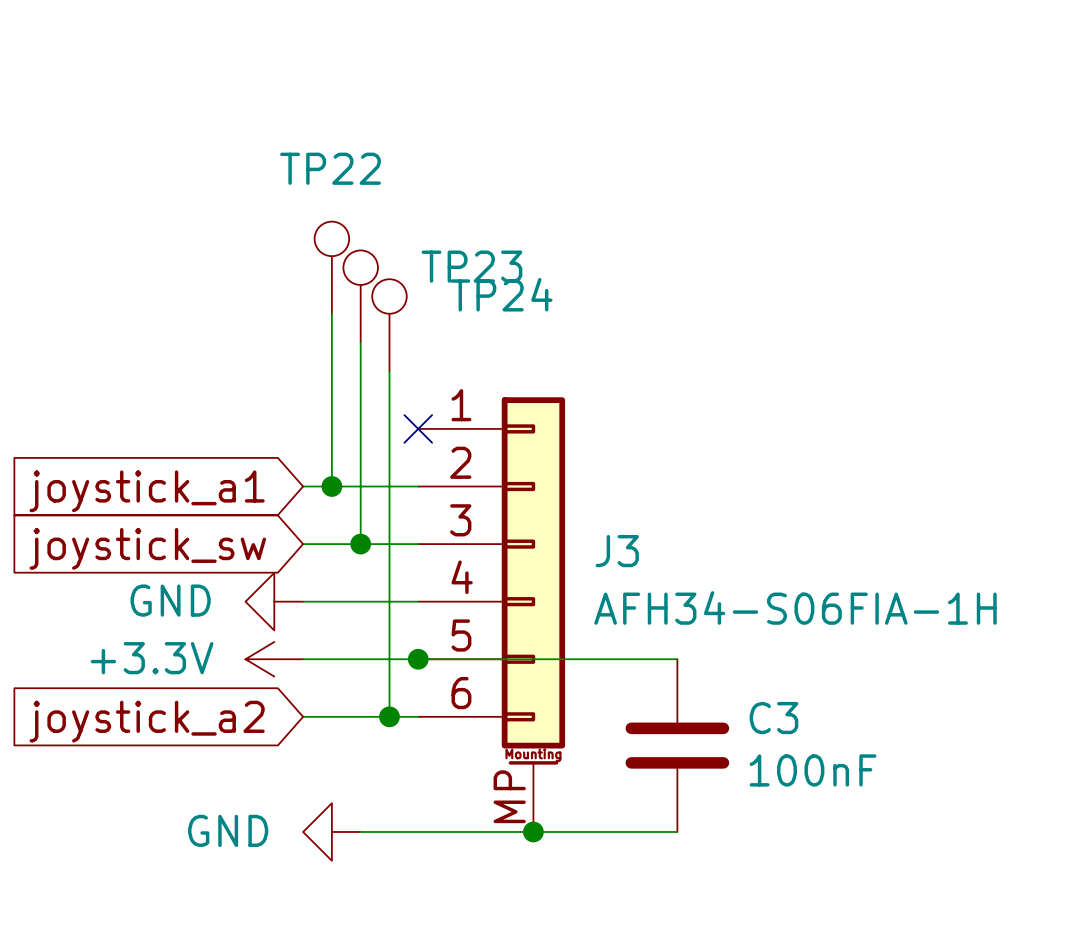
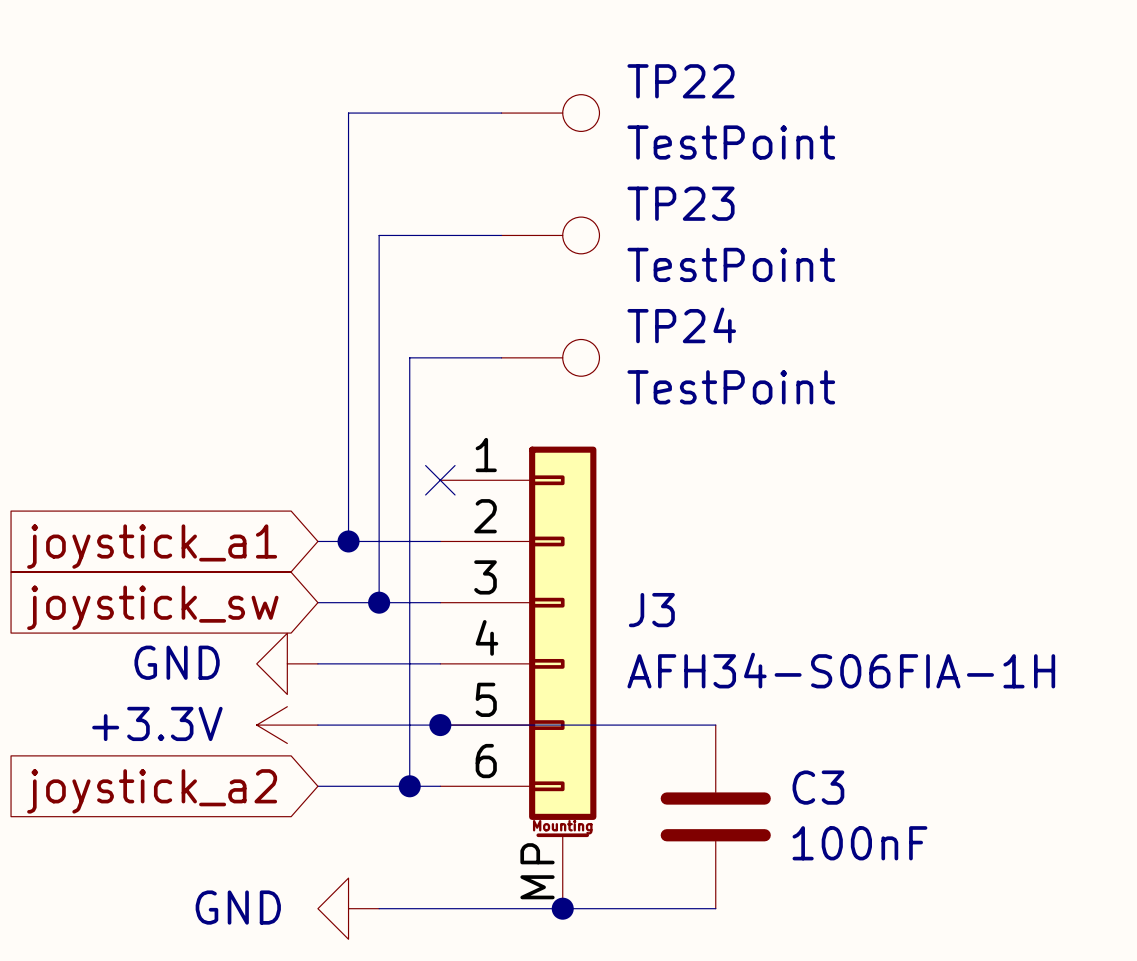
wire: none -> (501, 113) (348, 113) (348, 357)
TP22 value: none -> TestPoint (731, 142)
wire: none -> (501, 235) (379, 235) (379, 388)
TP23 value: none -> TestPoint (731, 264)
TP22 rotation: 0° (331, 238) -> 90° clockwise (581, 113)
TP22 position: (331, 267) -> (550, 113)
TP23 rotation: 0° (360, 267) -> 90° clockwise (581, 235)
TP23 position: (360, 296) -> (550, 235)
TP24 rotation: 0° (389, 296) -> 90° clockwise (581, 357)
wire: none -> (501, 357) (409, 357) (409, 419)
TP24 position: (389, 325) -> (550, 357)
TP24 value: none -> TestPoint (731, 387)

